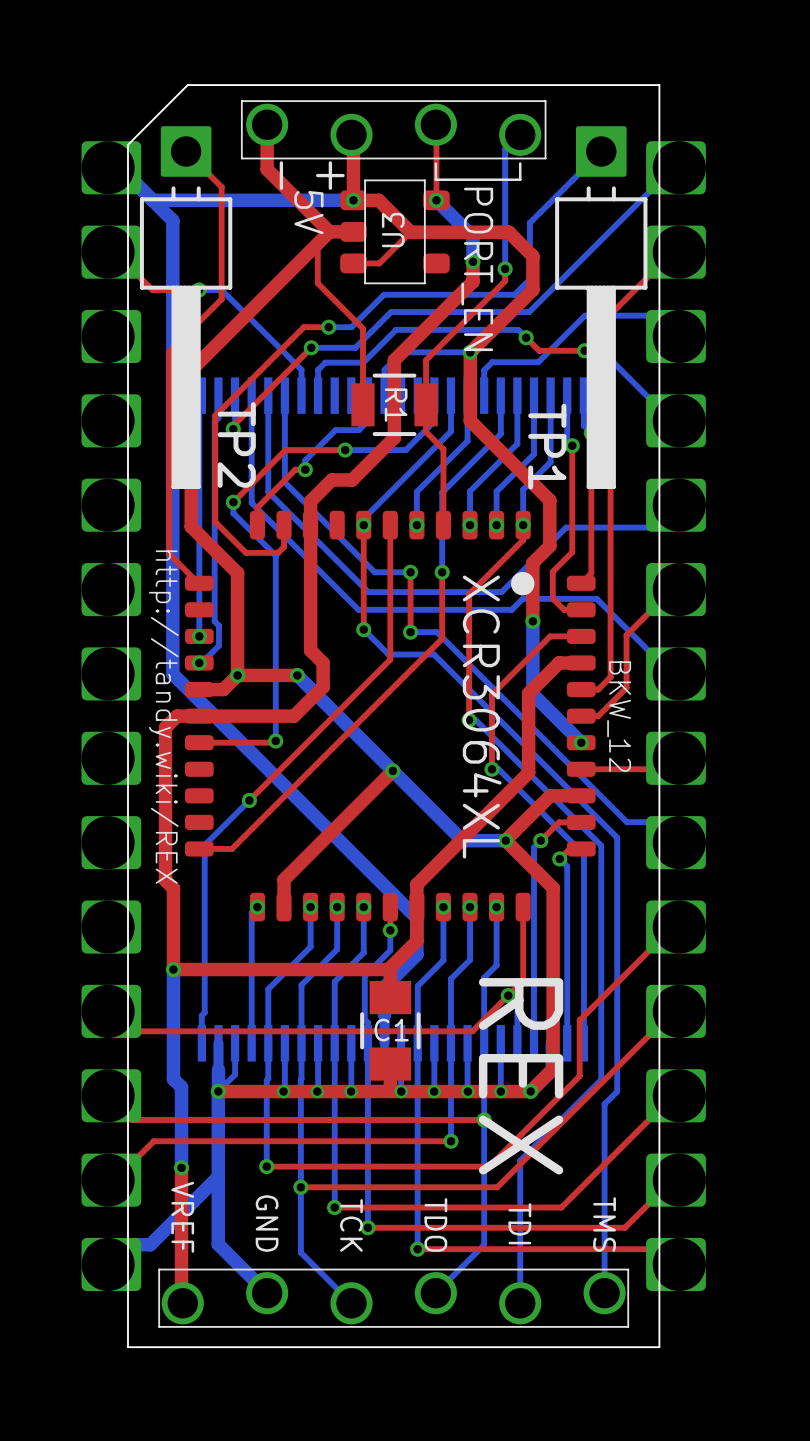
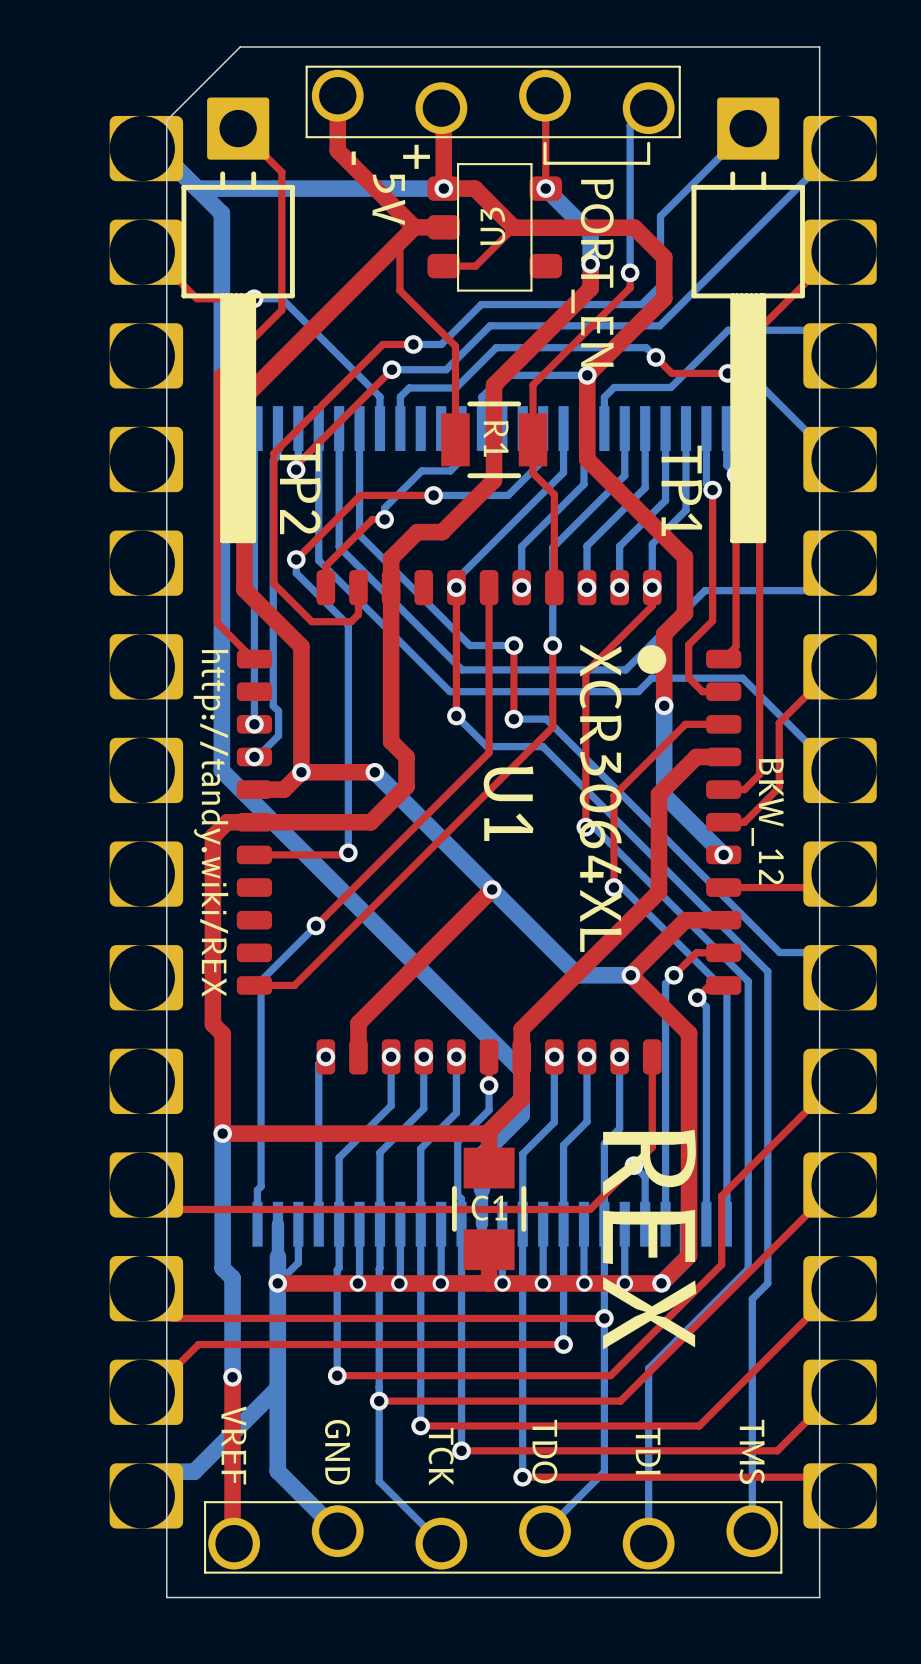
U1 name: none -> U1 (508, 803)

